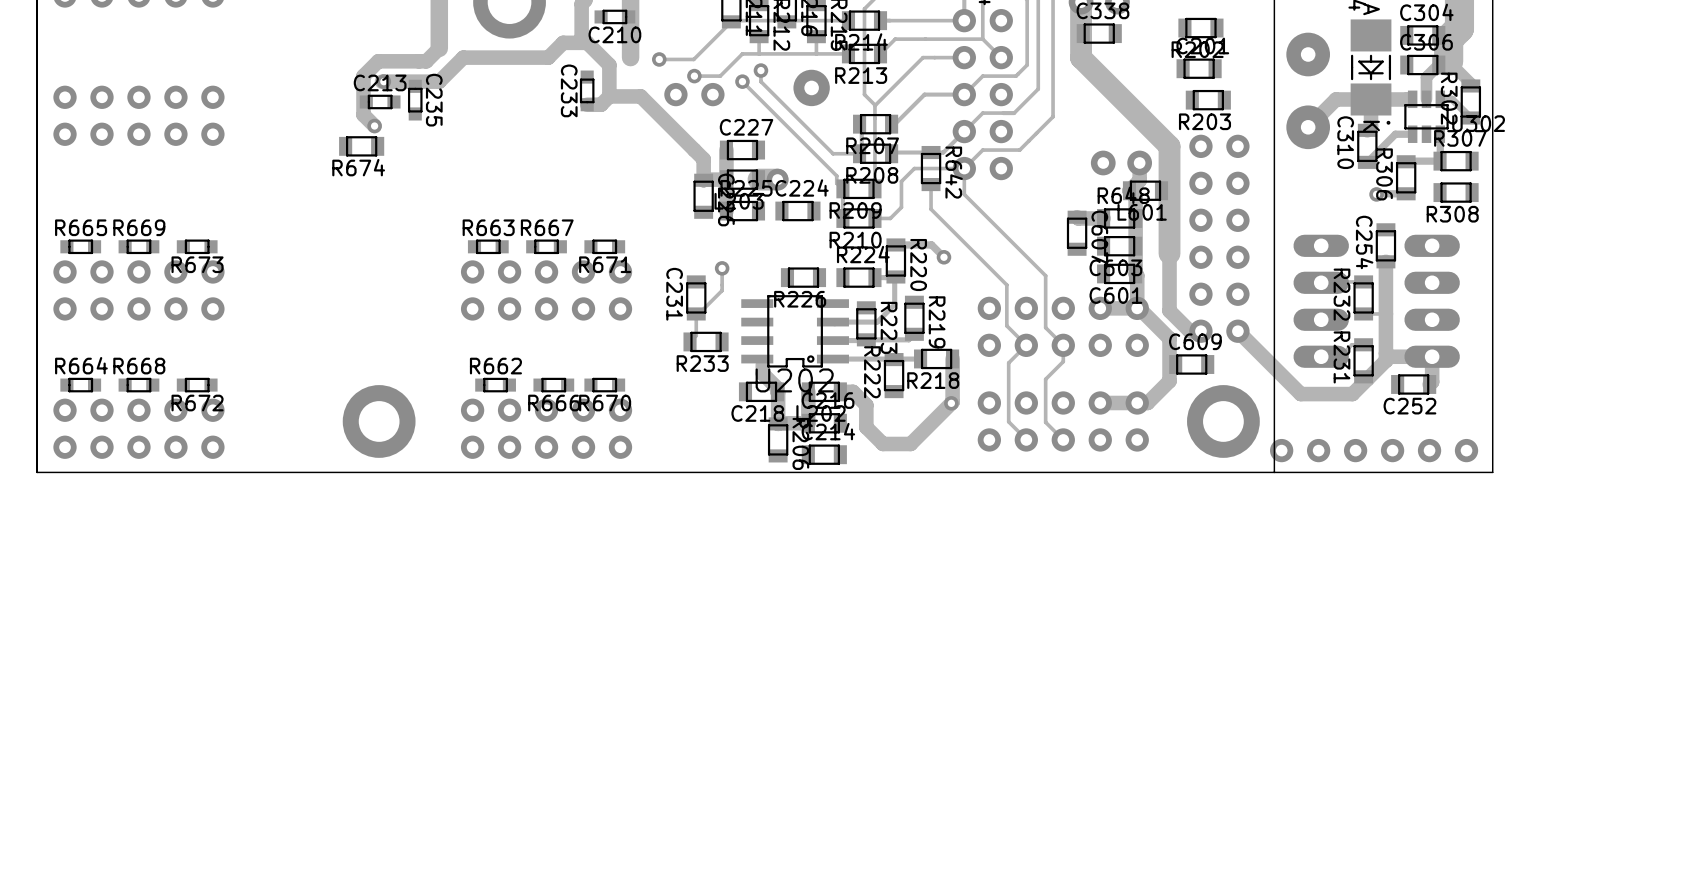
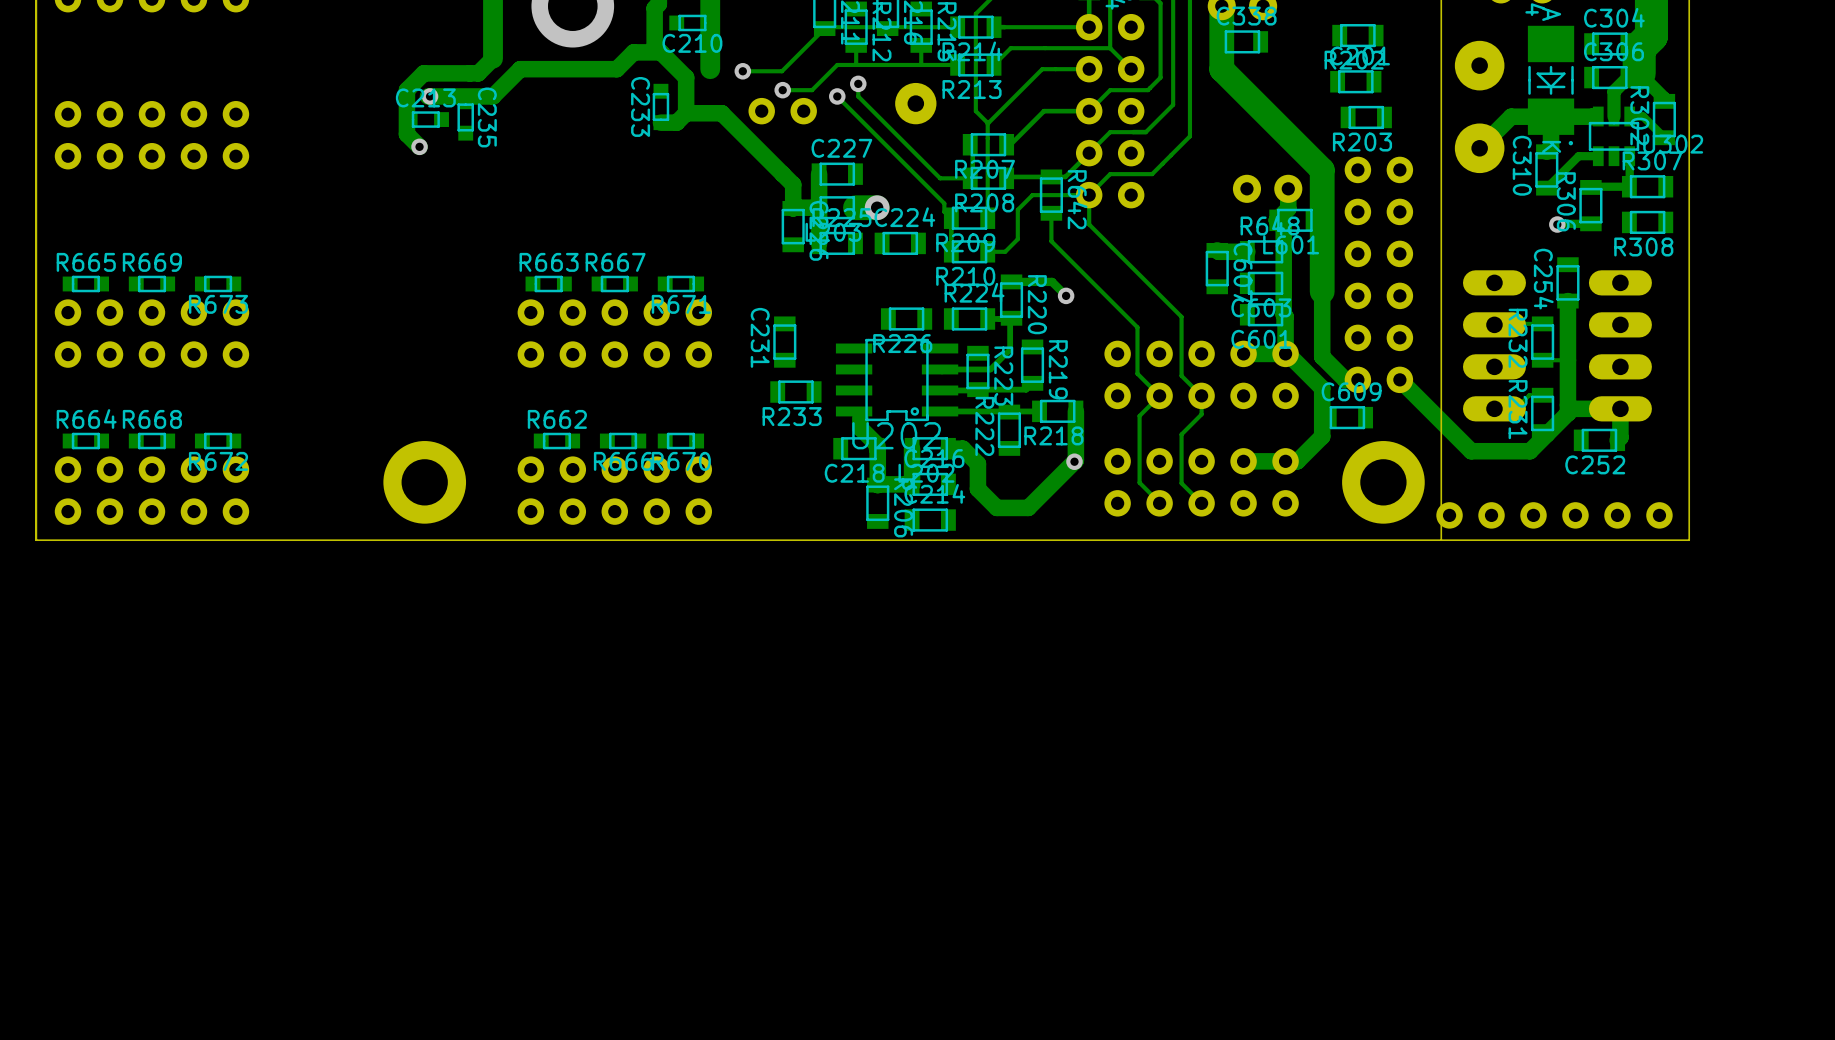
R674: (361, 146) -> none
track: (722, 268) (722, 290) (698, 313) (696, 313) (696, 335) (690, 341) -> none
via: (722, 268) -> none

